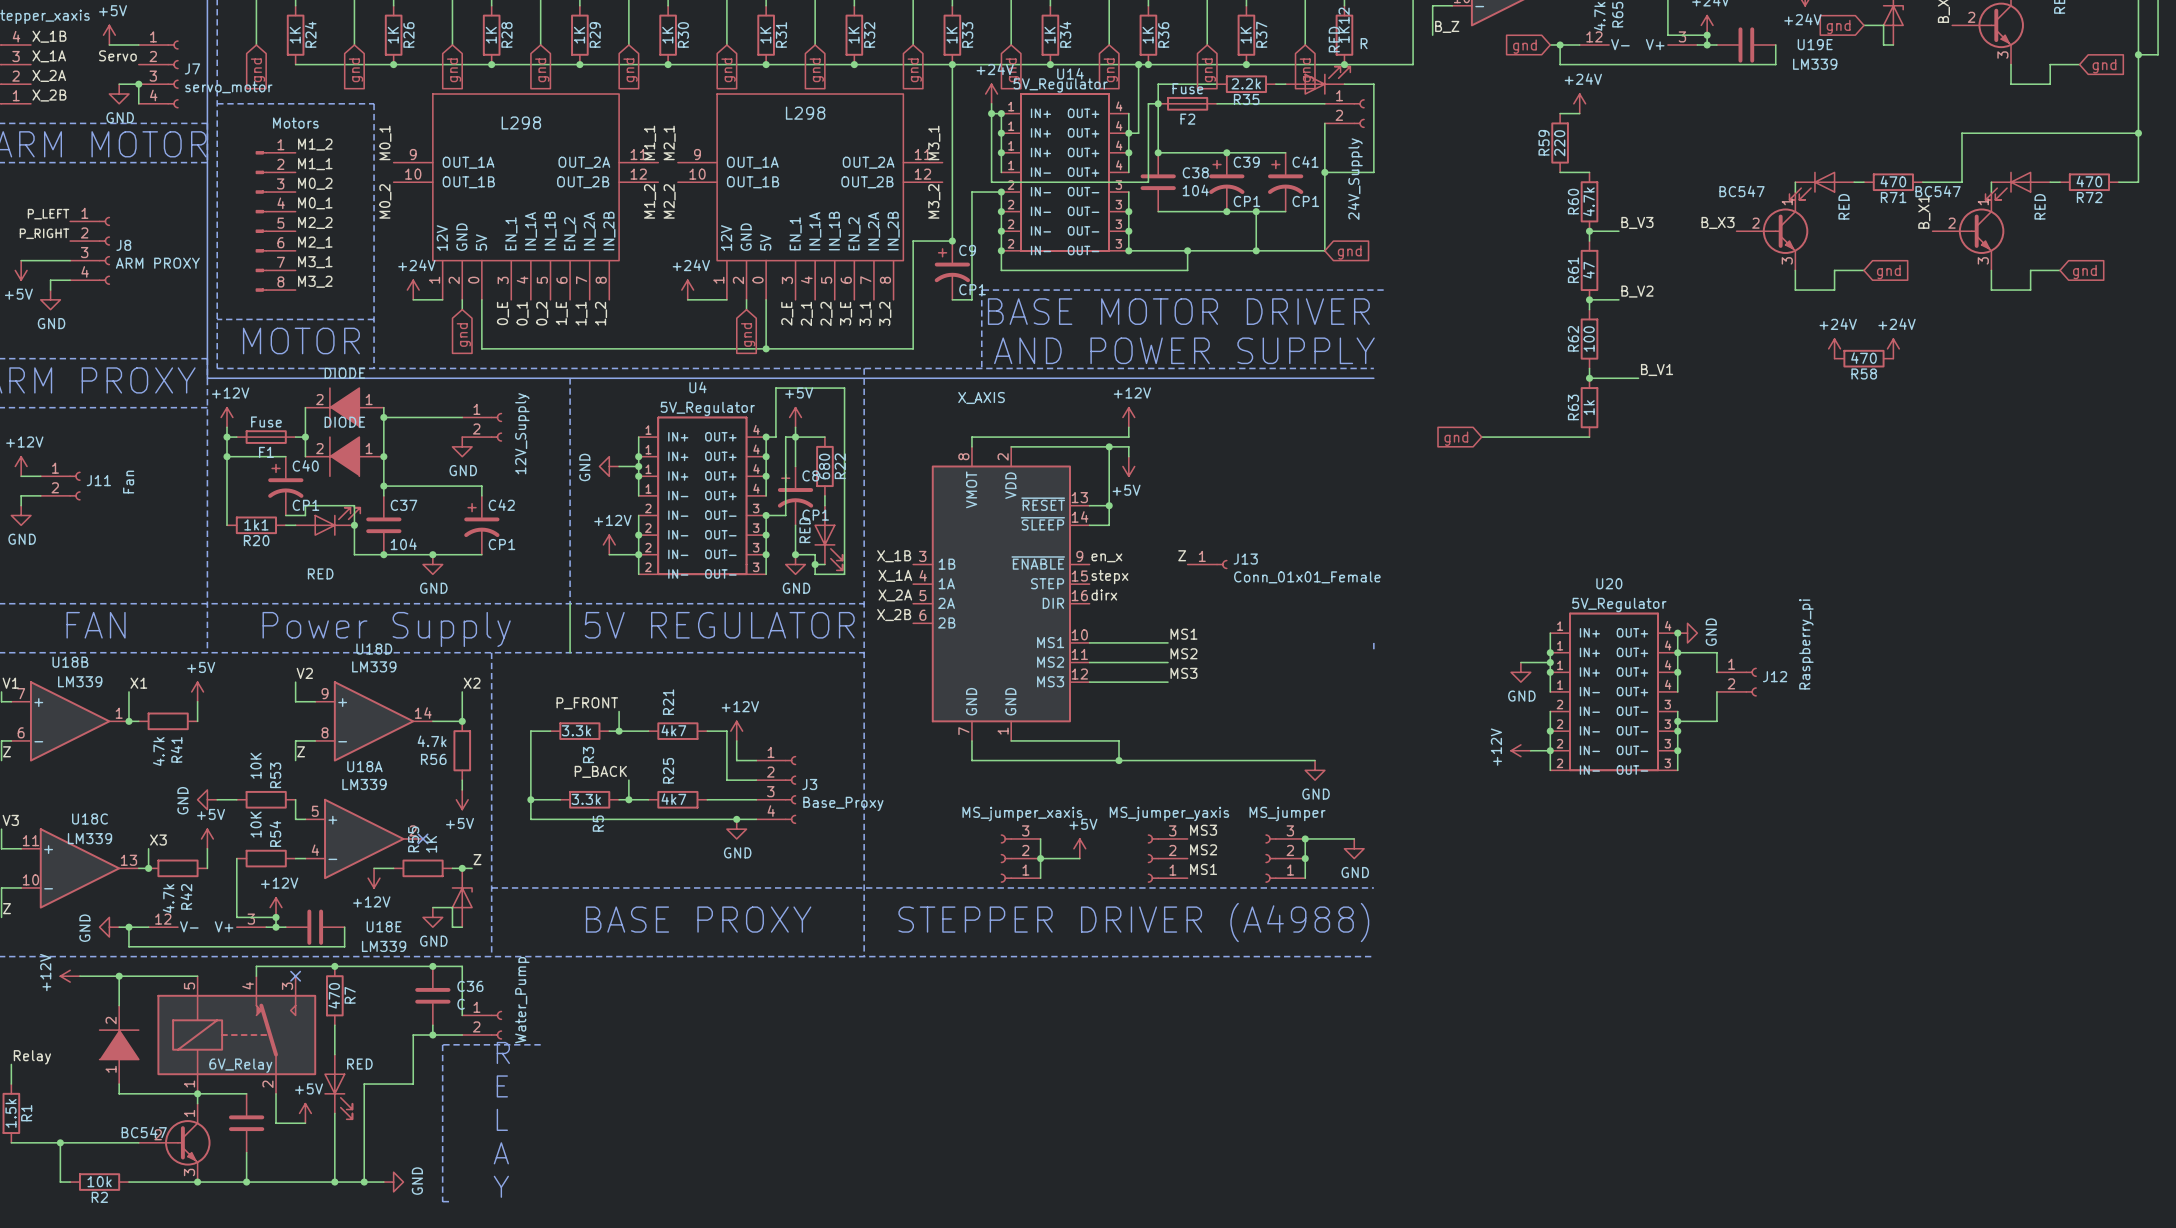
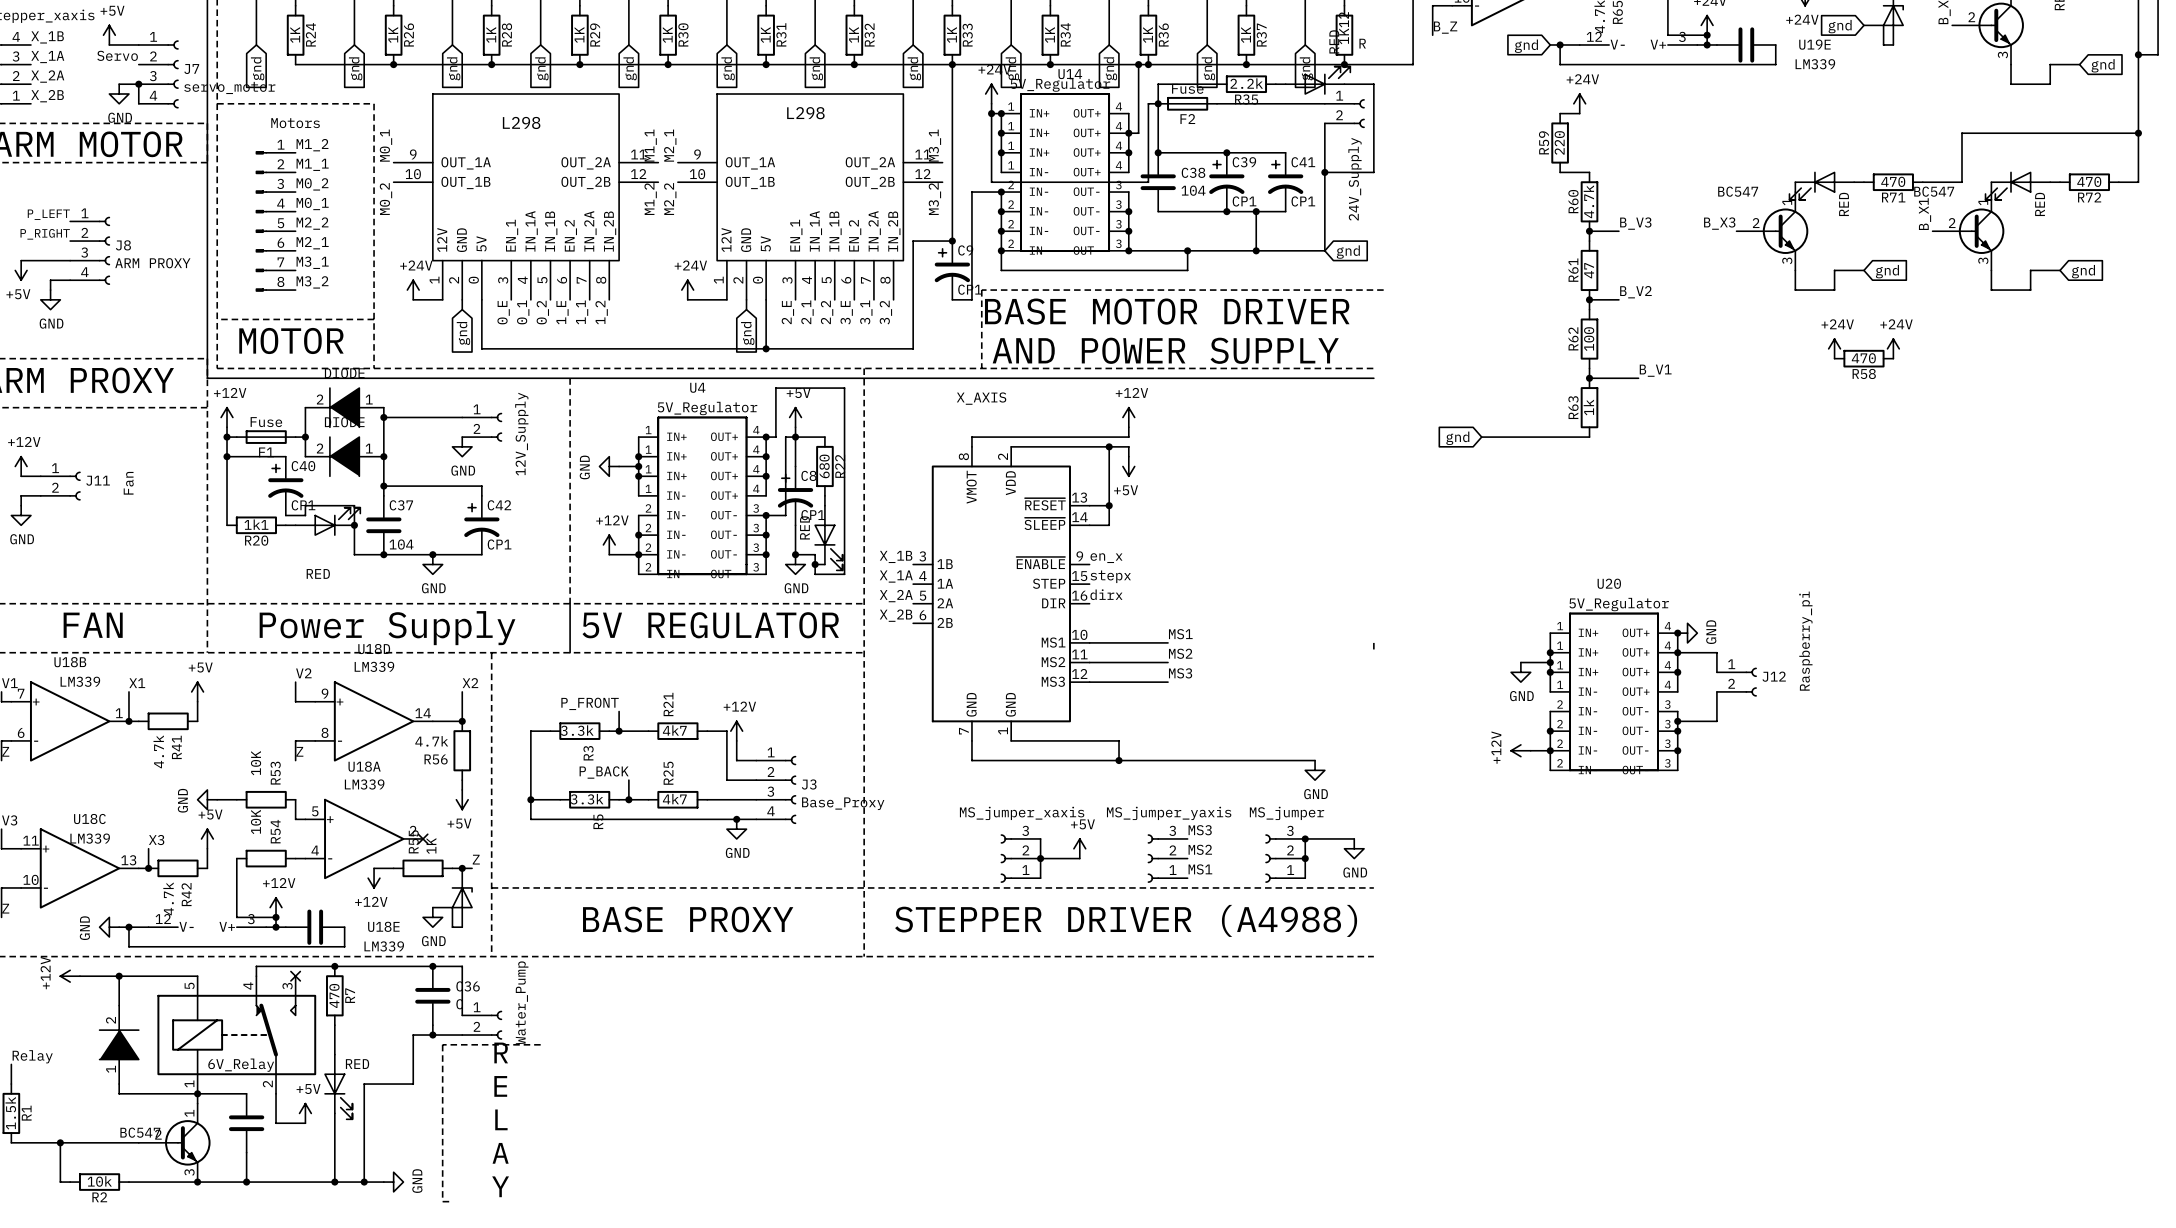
label: Z (1182, 555) -> none
J13: Conn_01x01_Female (1207, 564) -> none

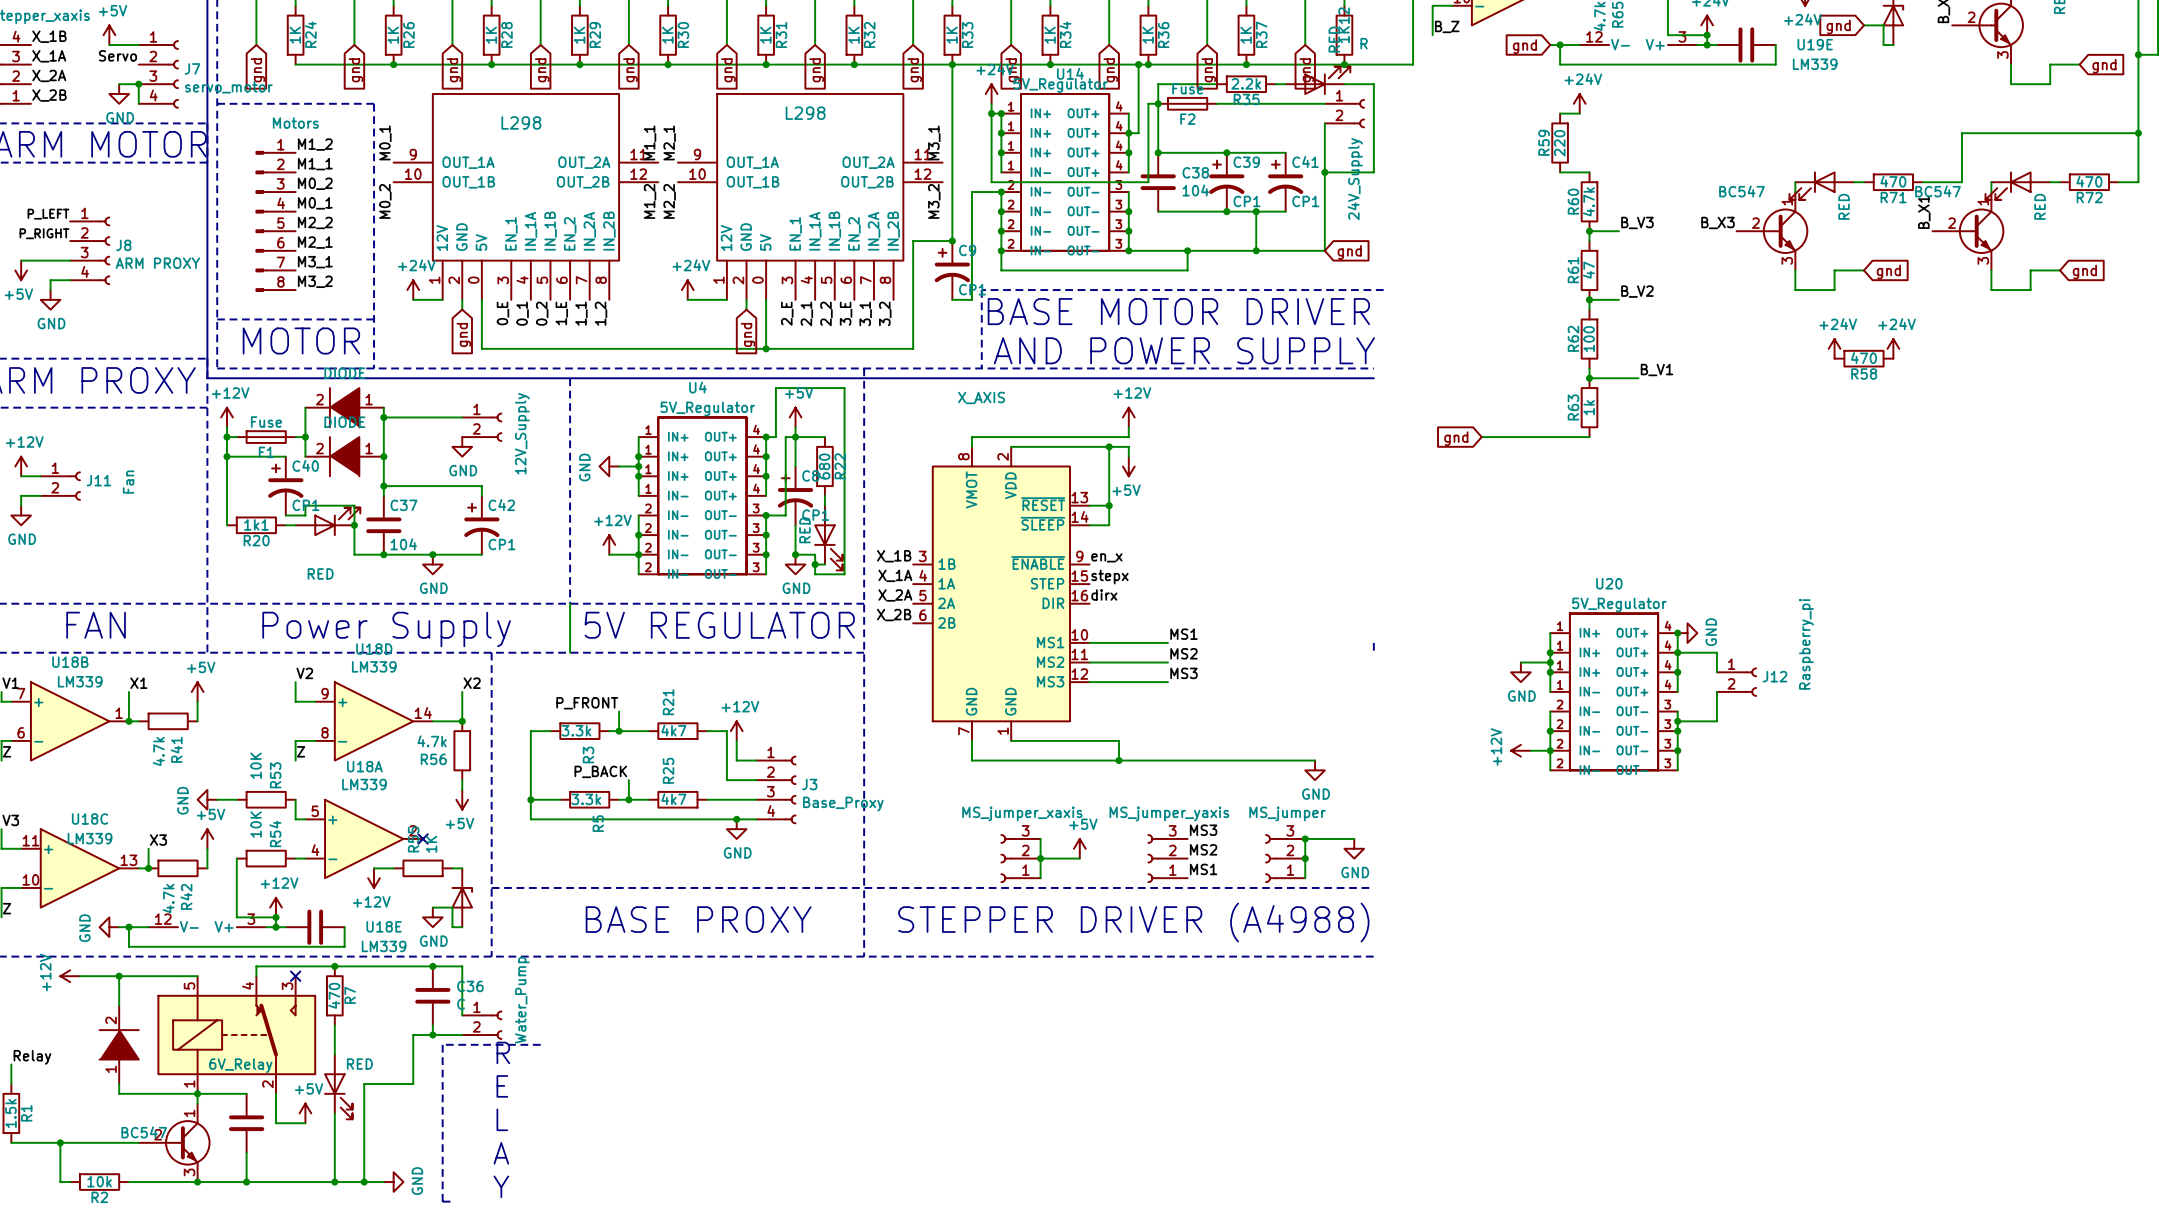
label: Z (476, 859) -> none
wire: (462, 868) (472, 868) -> none
junction: (462, 868) -> none

